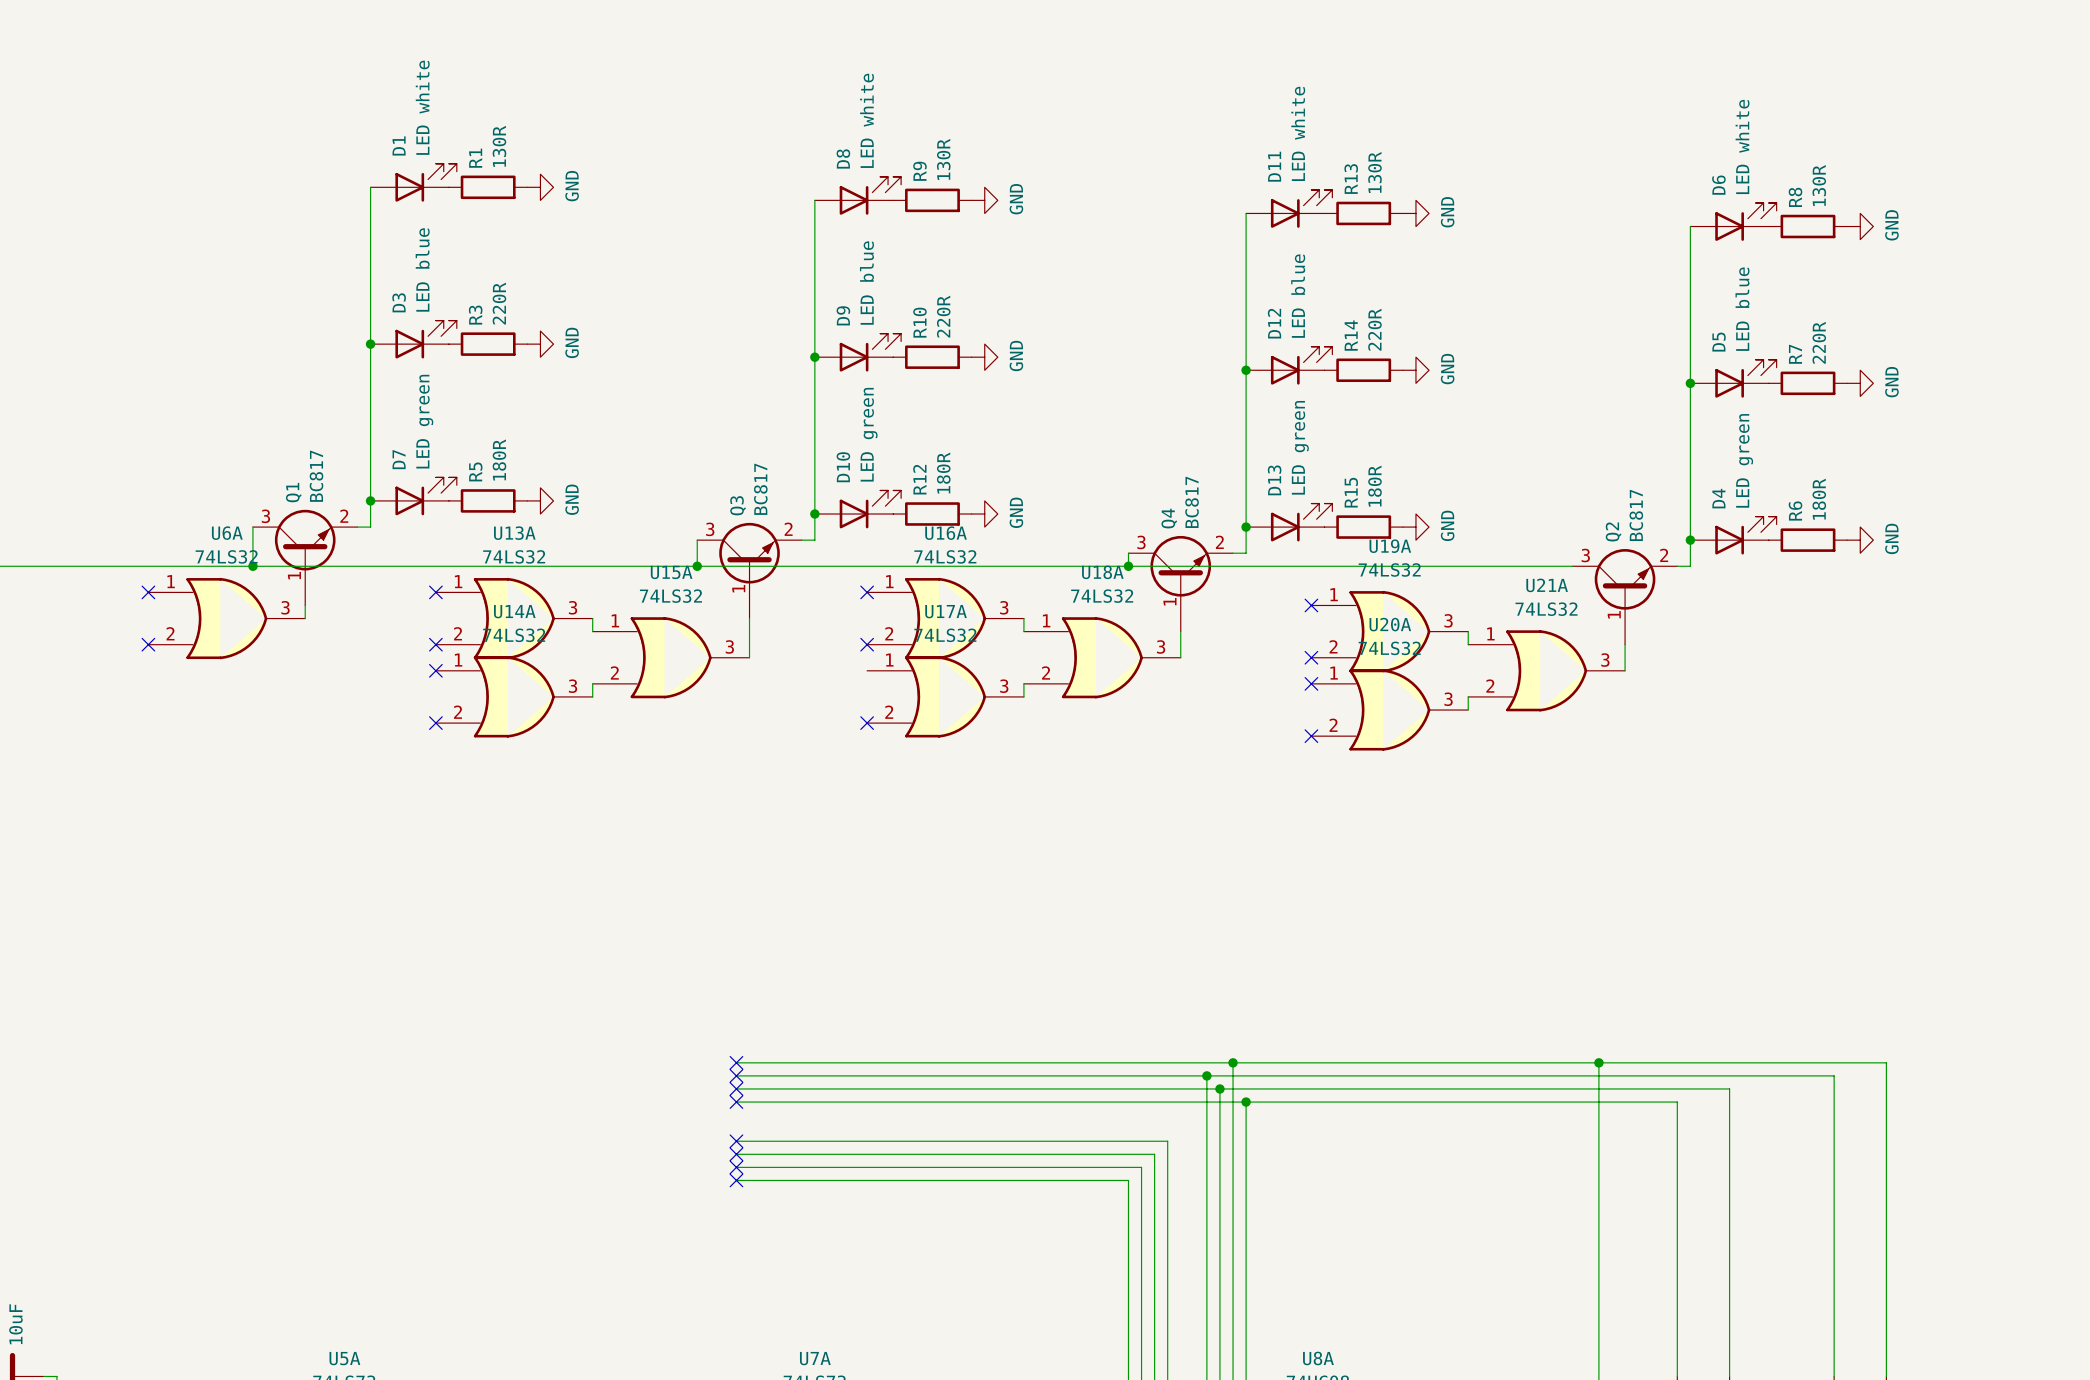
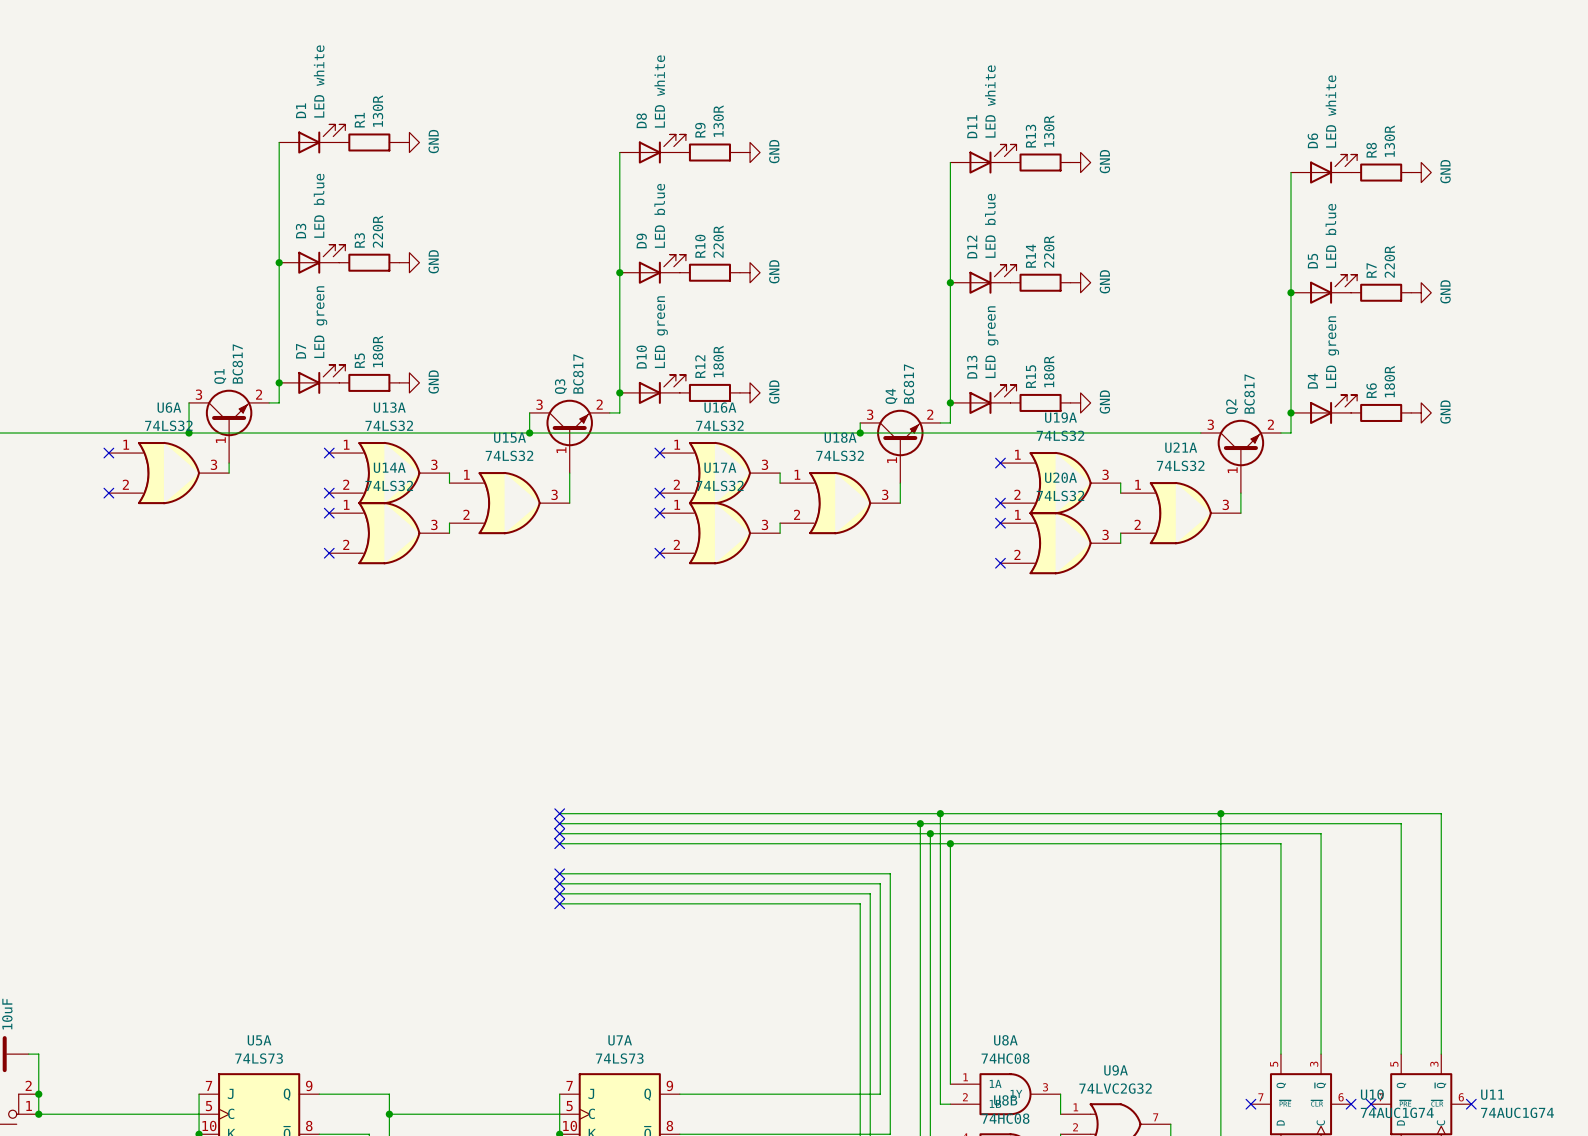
no-connect mark: none -> (659, 513)

